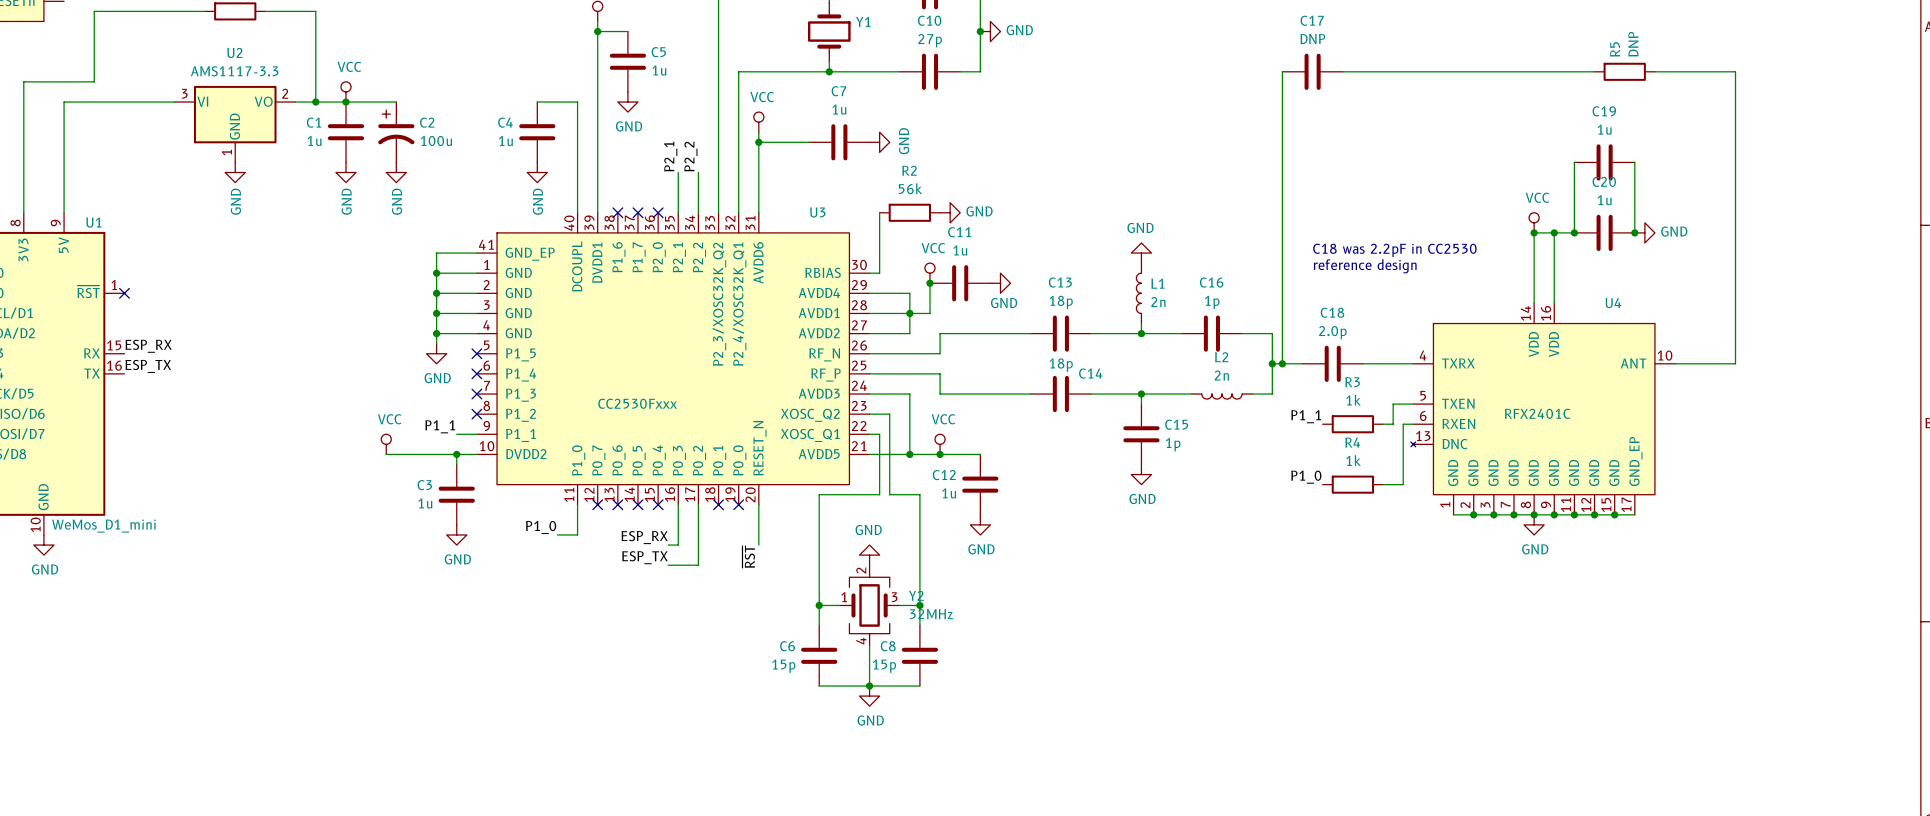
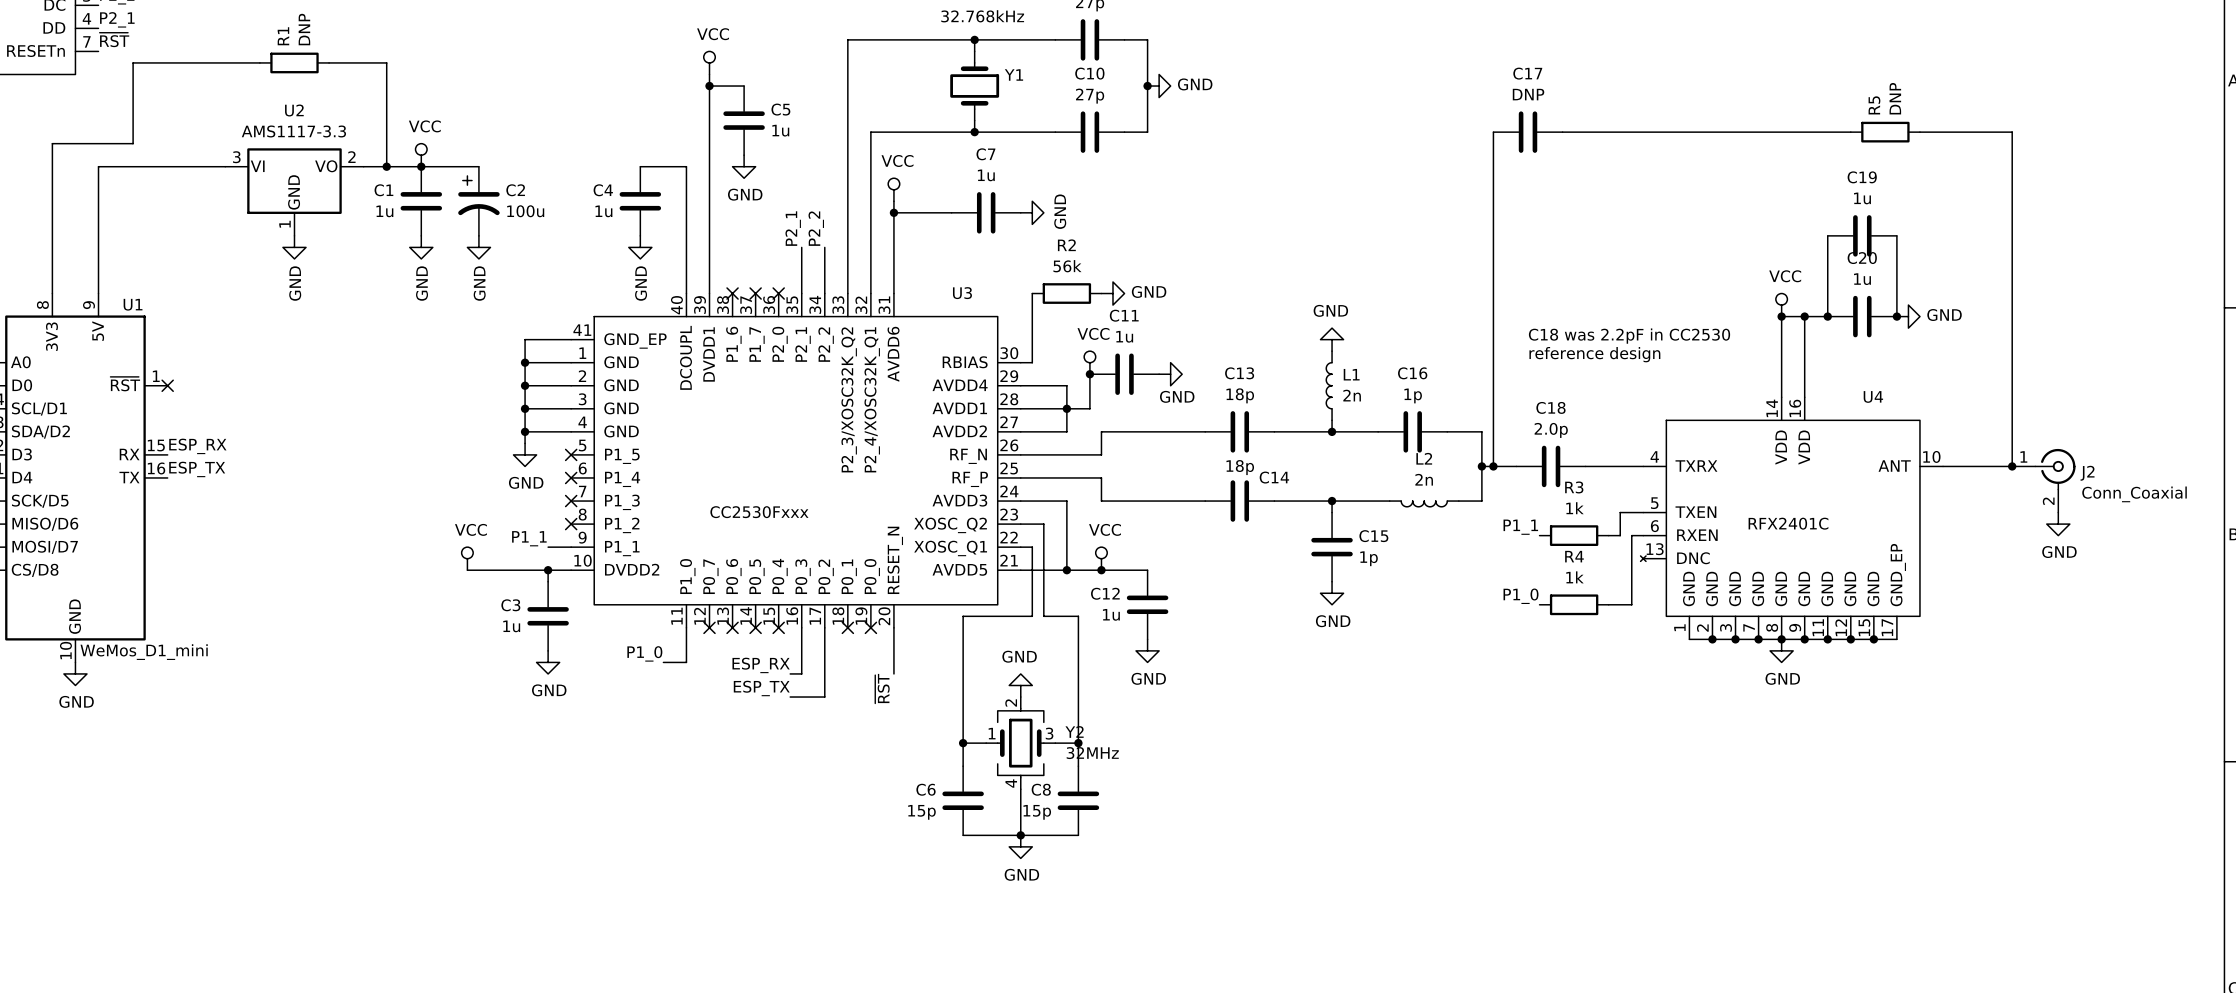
junction: none -> (2012, 466)
J2: none -> Conn_Coaxial (2043, 480)
power symbol: none -> GND (2058, 524)

